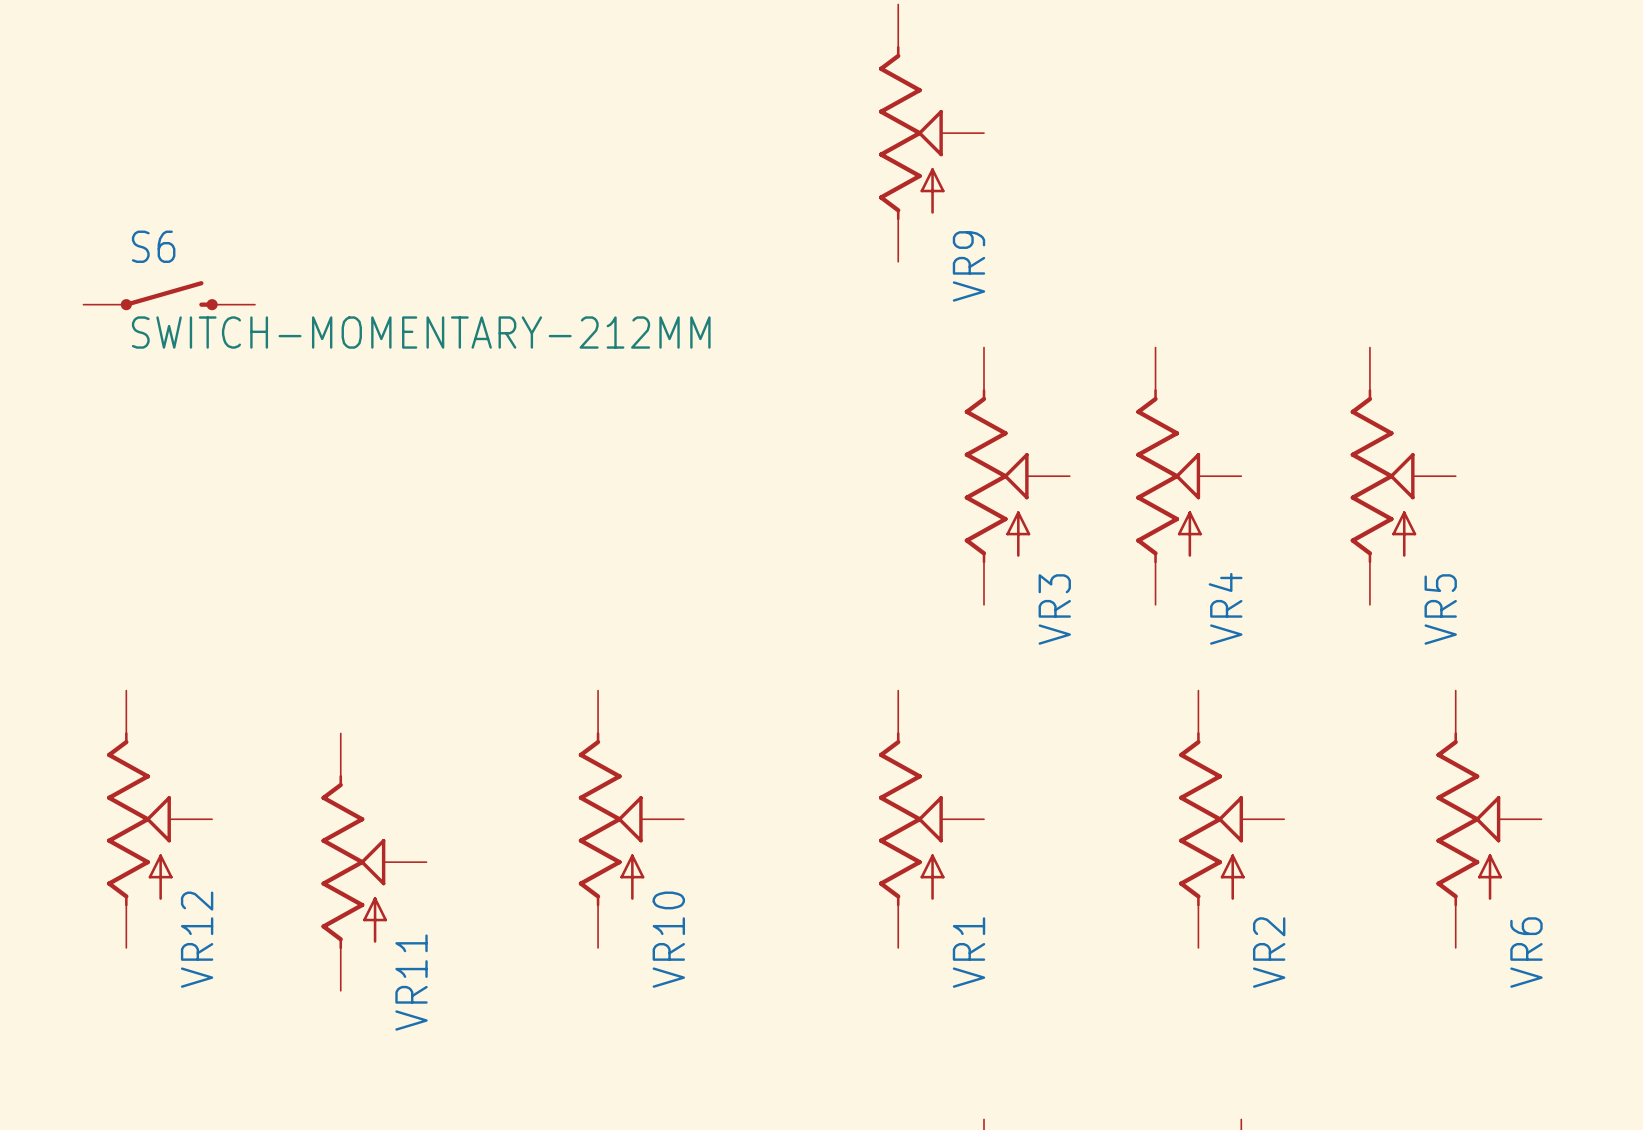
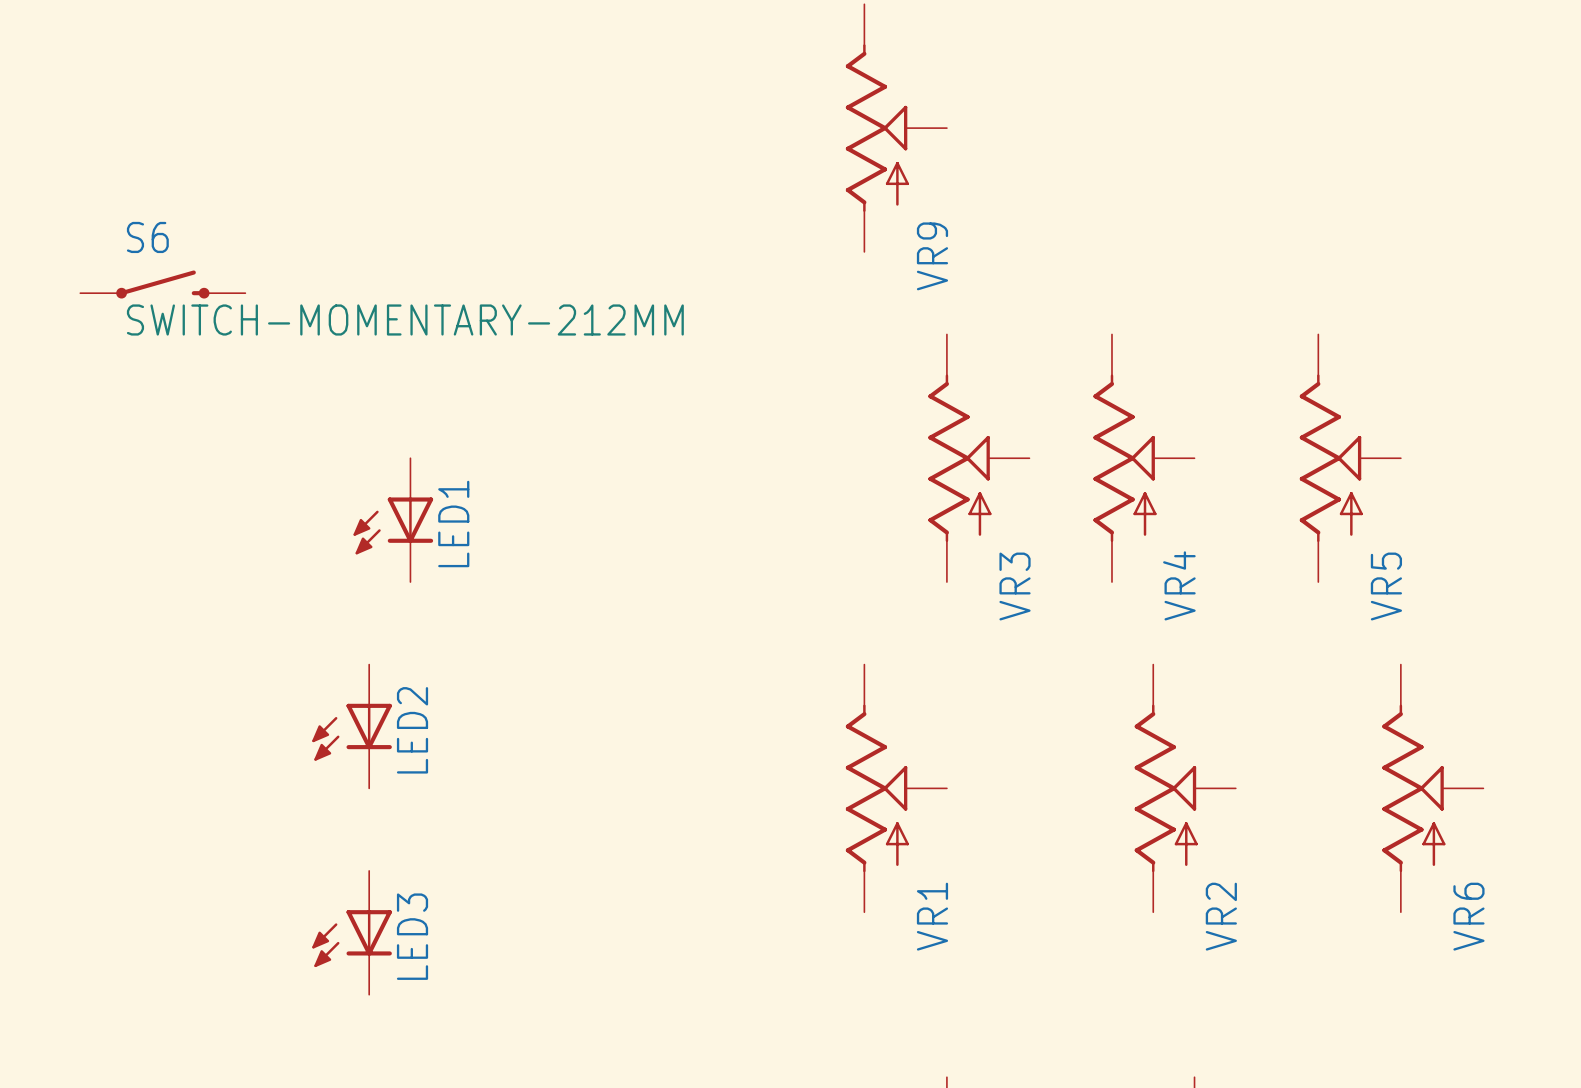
LED1: none -> (393, 520)
LED2: none -> (352, 726)
VR12: (159, 819) -> none
VR10: (631, 819) -> none
VR11: (373, 862) -> none
LED3: none -> (352, 932)

